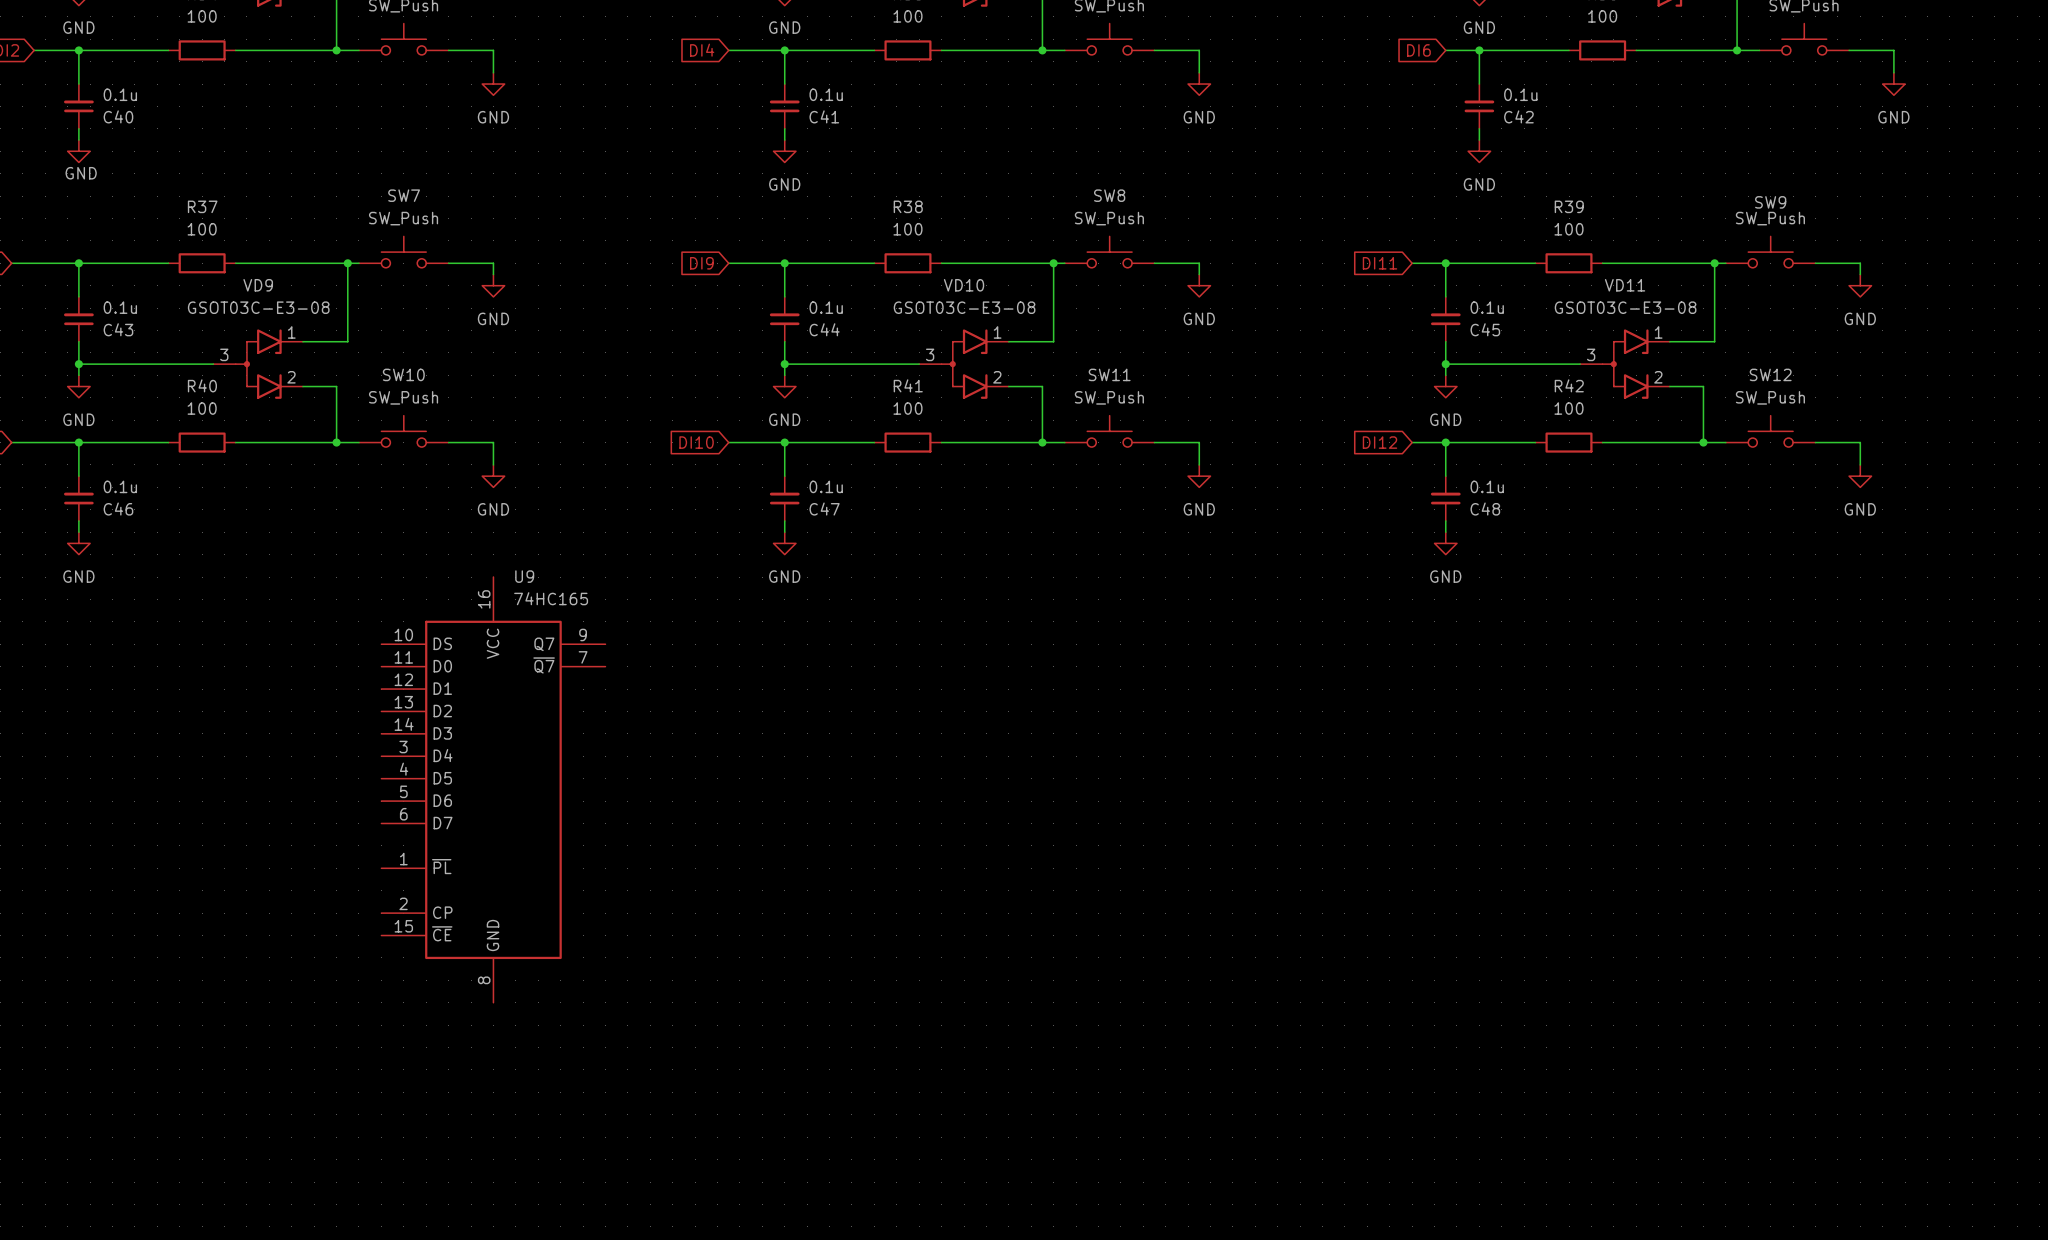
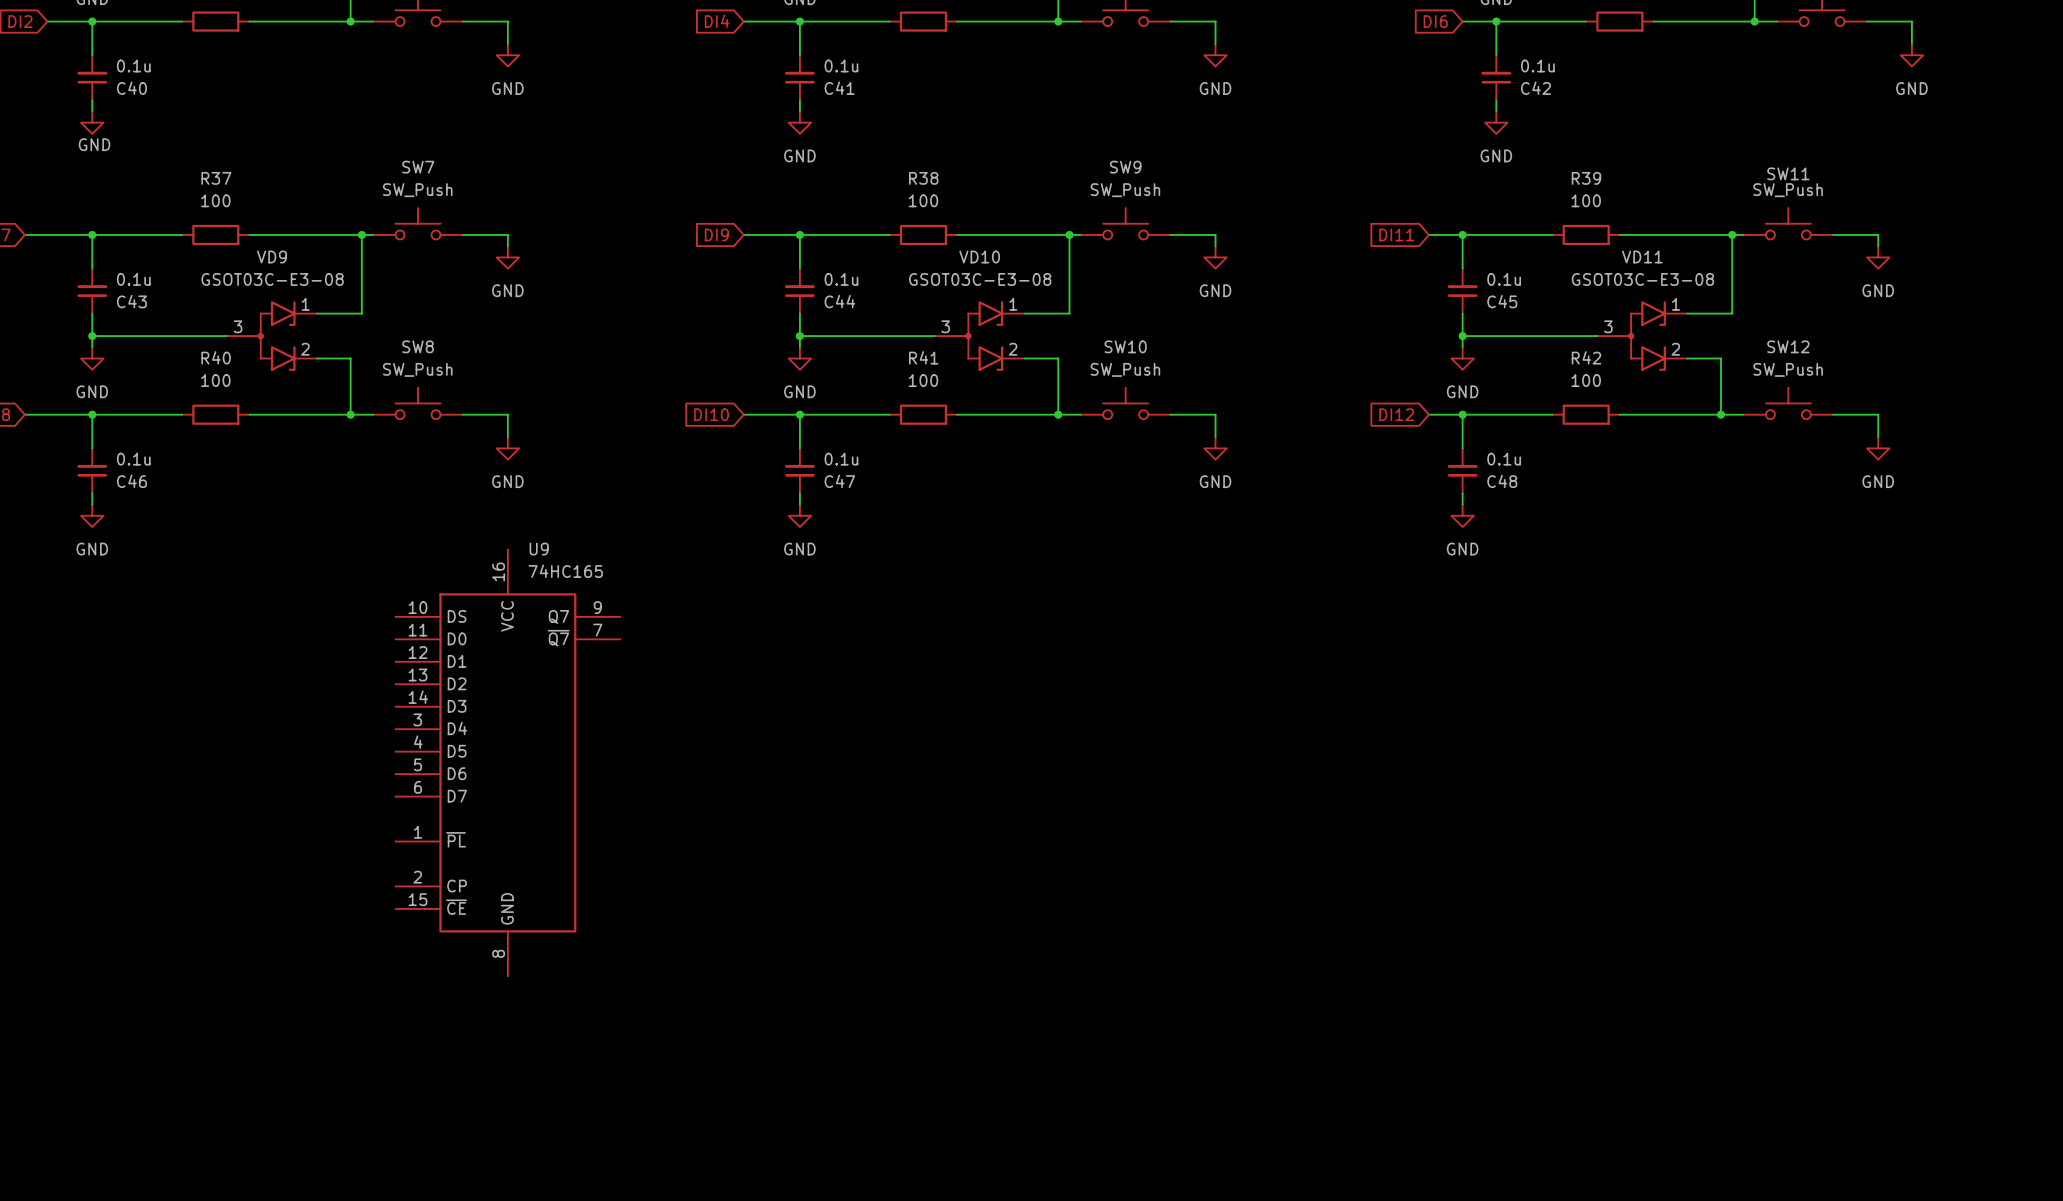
SW8 name: SW8 (1109, 195) -> SW9 (1125, 167)
SW9 name: SW9 (1770, 202) -> SW11 (1788, 173)
SW10 name: SW10 (403, 374) -> SW8 (418, 346)
SW11 name: SW11 (1109, 374) -> SW10 (1125, 346)

